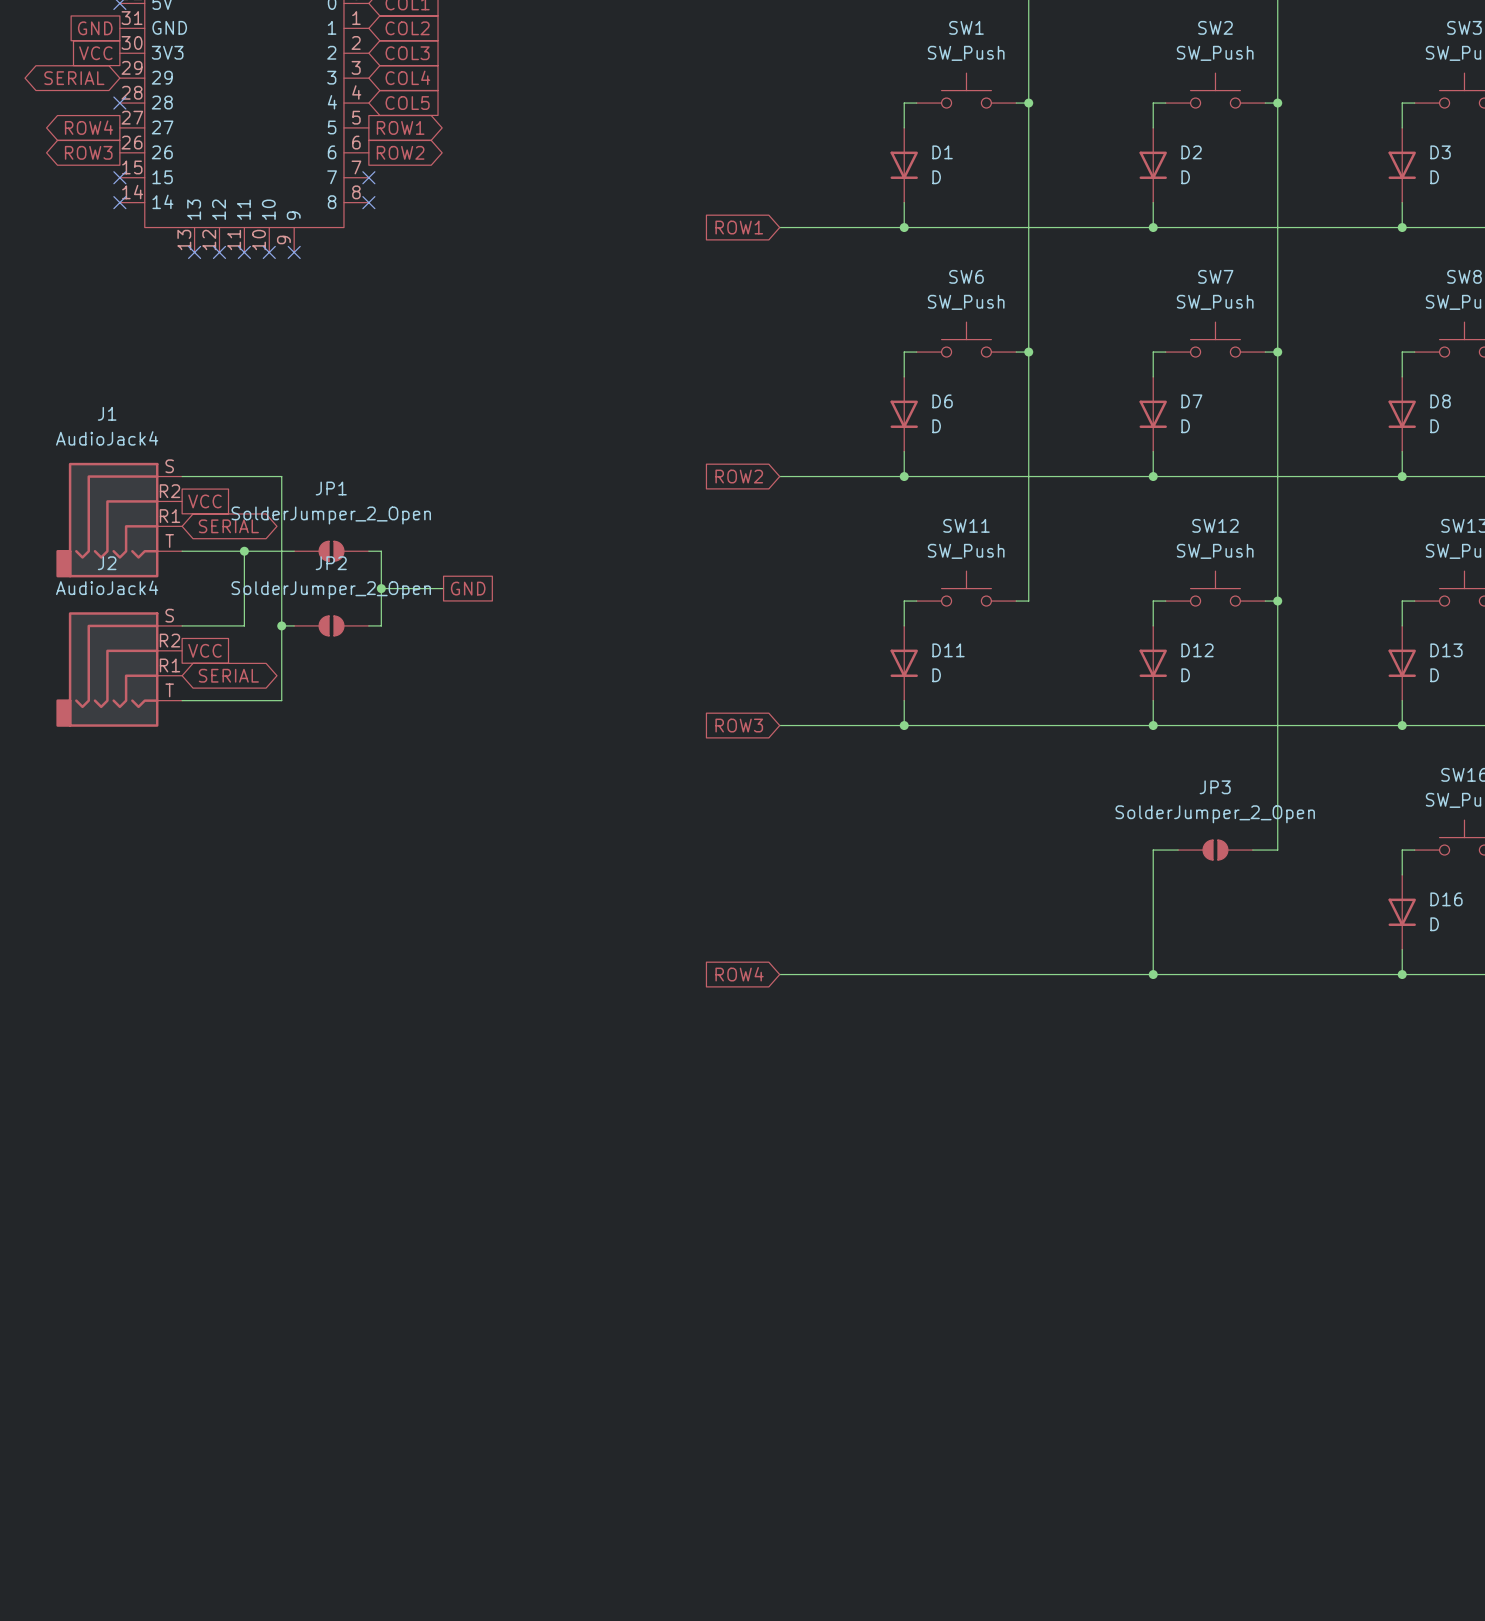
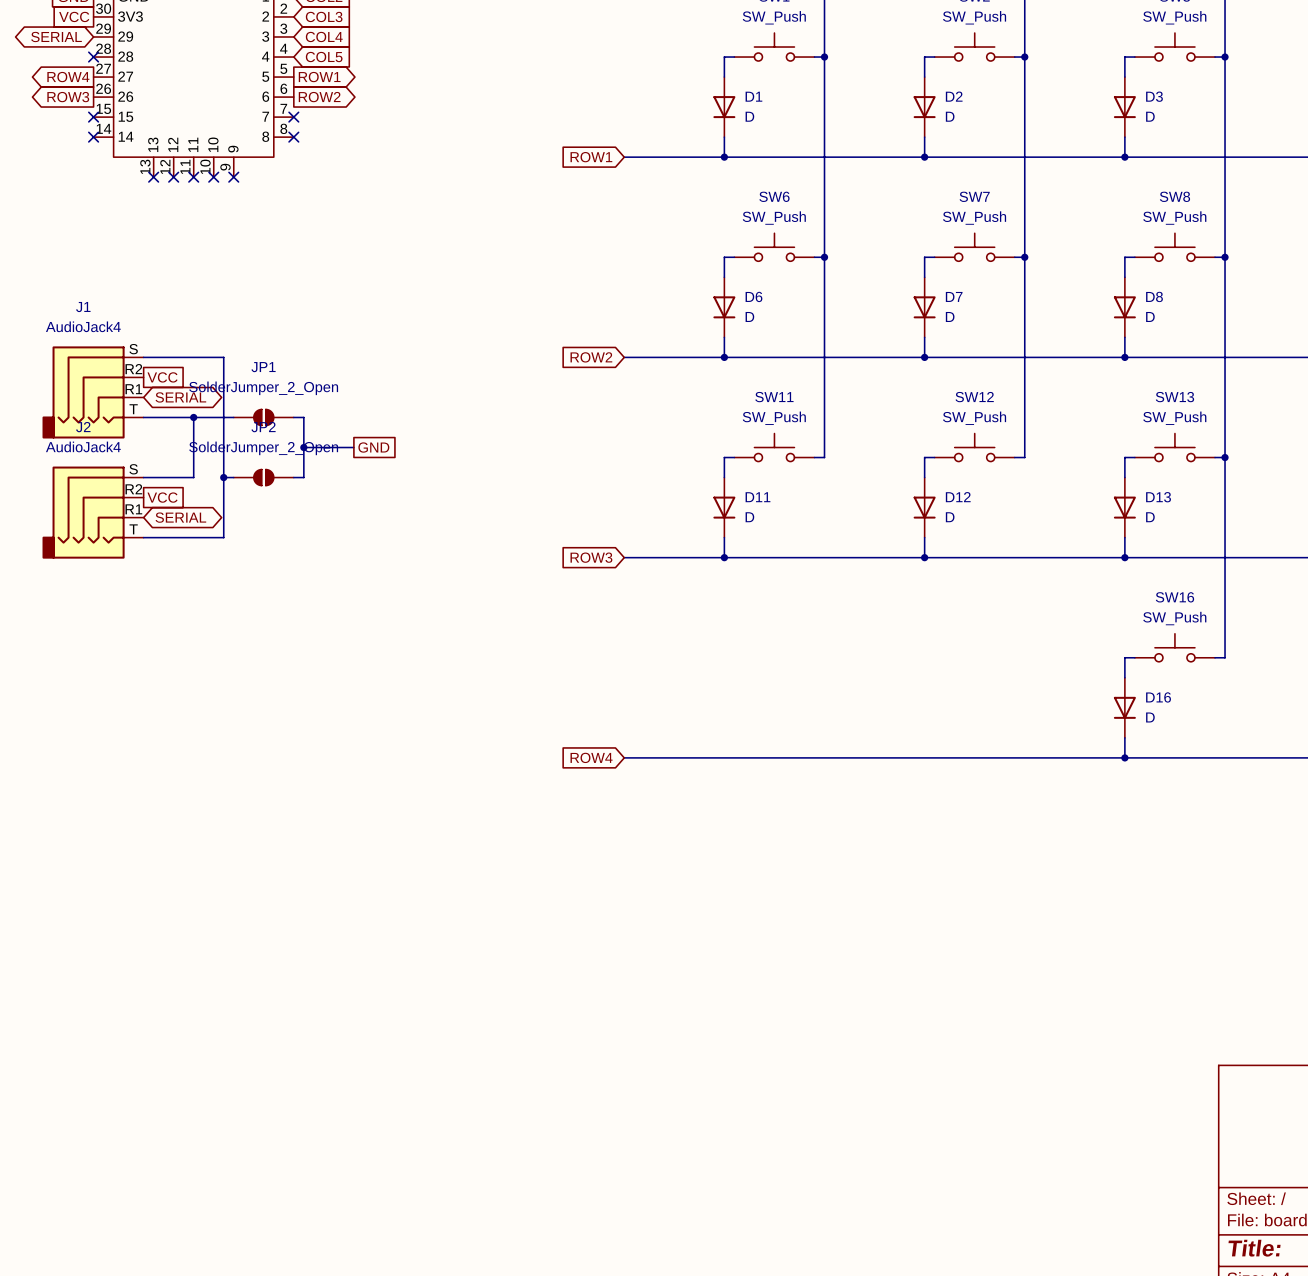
wire: (1277, 601) (1277, 850) (1252, 850) -> none
junction: (1277, 601) -> none
wire: (1178, 850) (1153, 850) (1153, 974) -> none
JP3: SolderJumper_2_Open (1215, 850) -> none
junction: (1153, 974) -> none

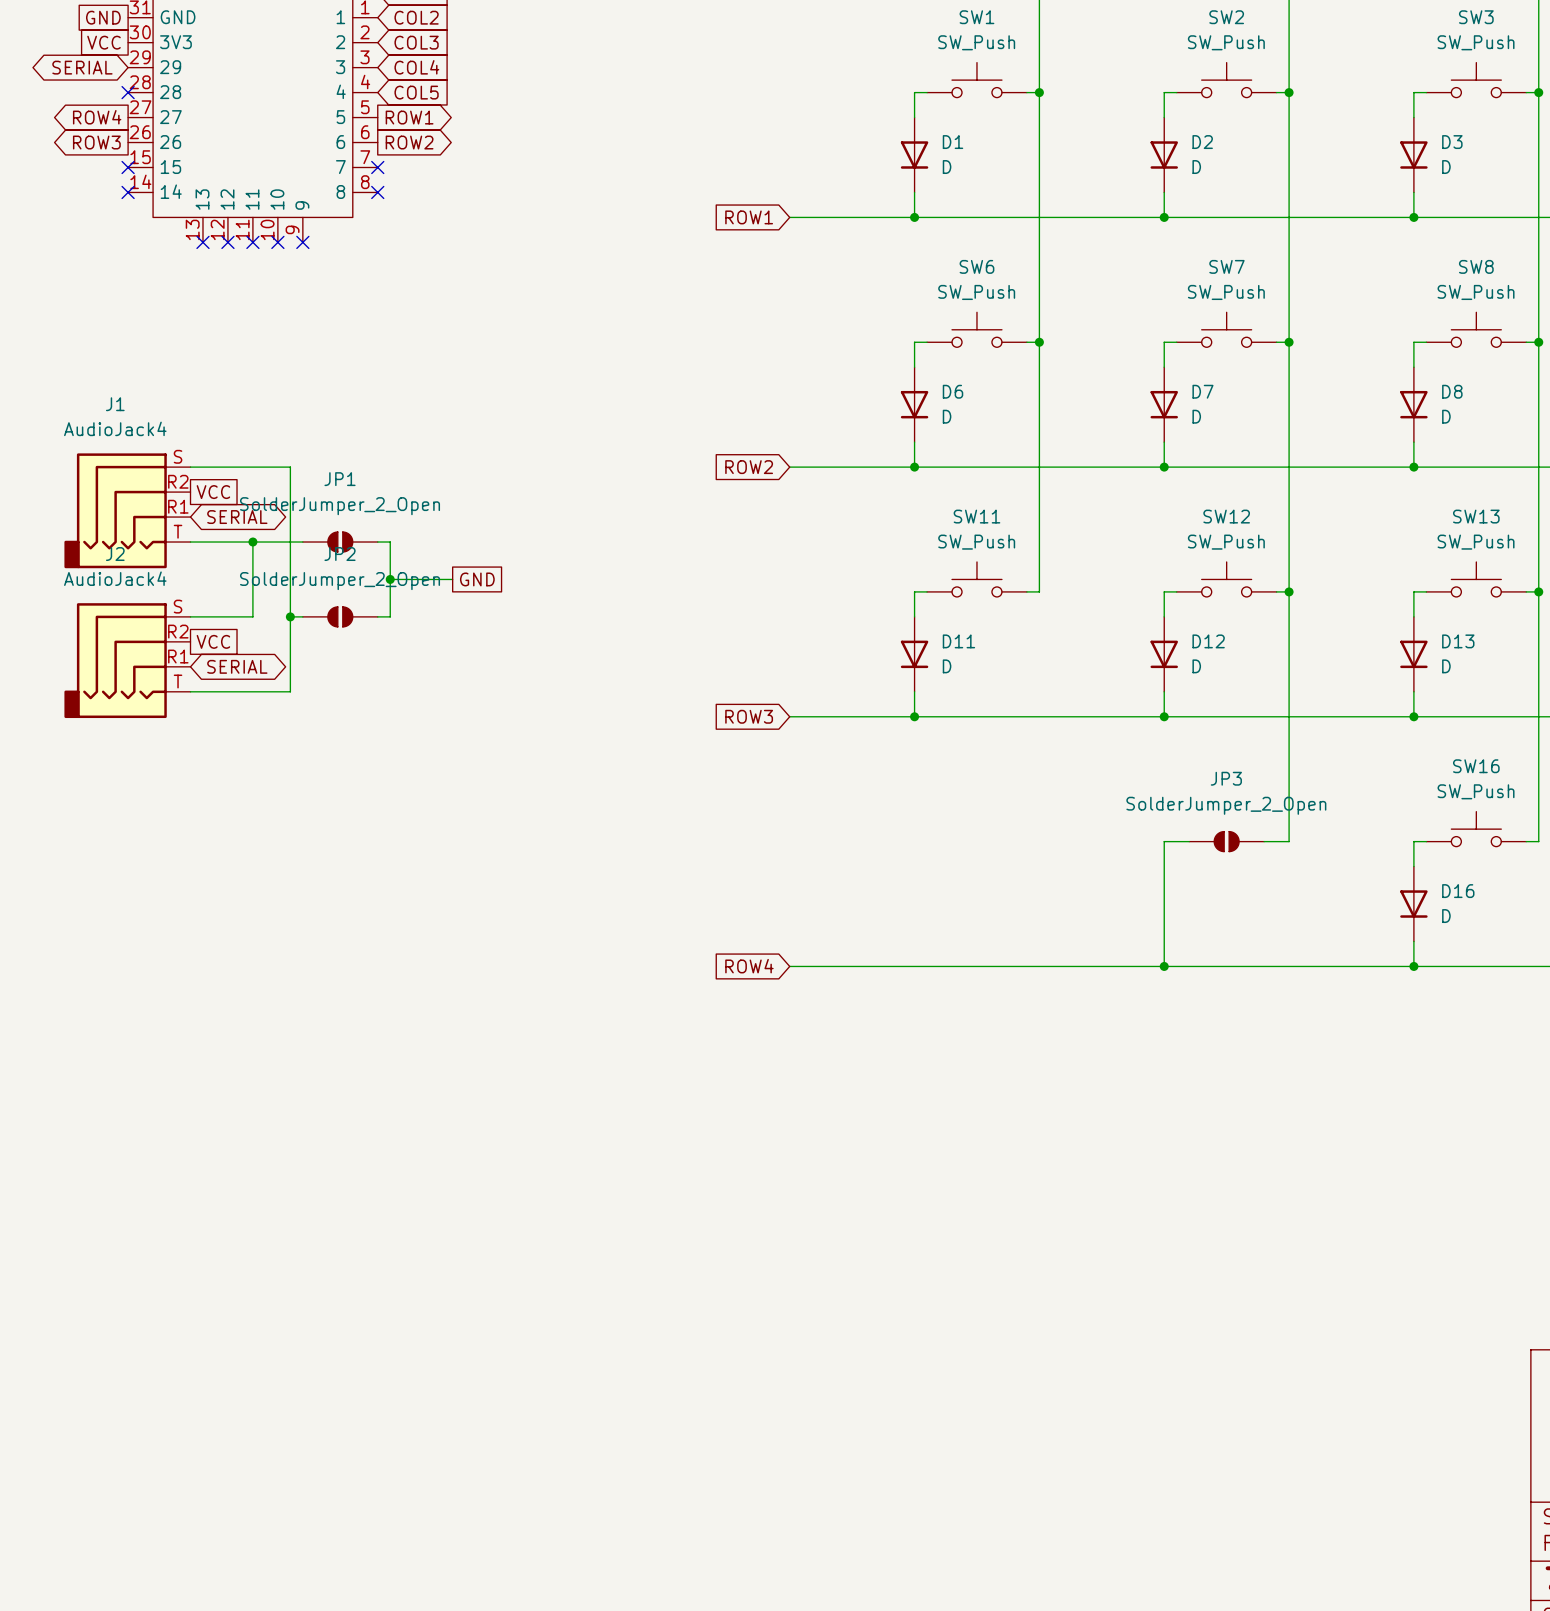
wire: none -> (1289, 591) (1289, 841) (1264, 841)
junction: none -> (1289, 591)
wire: none -> (1189, 841) (1164, 841) (1164, 966)
JP3: none -> SolderJumper_2_Open (1226, 841)
junction: none -> (1164, 966)

